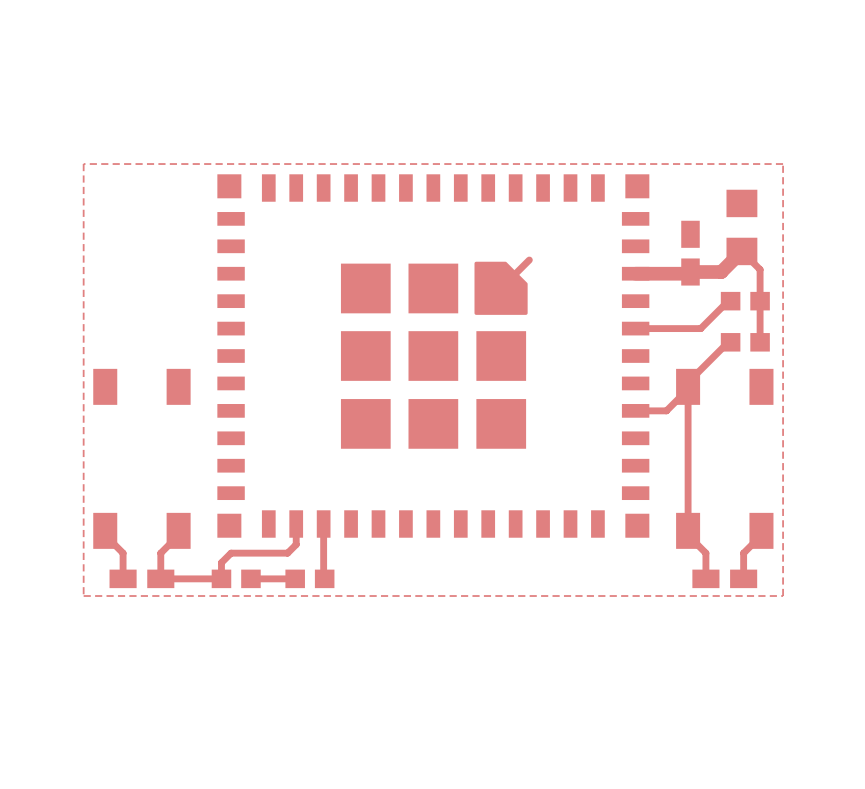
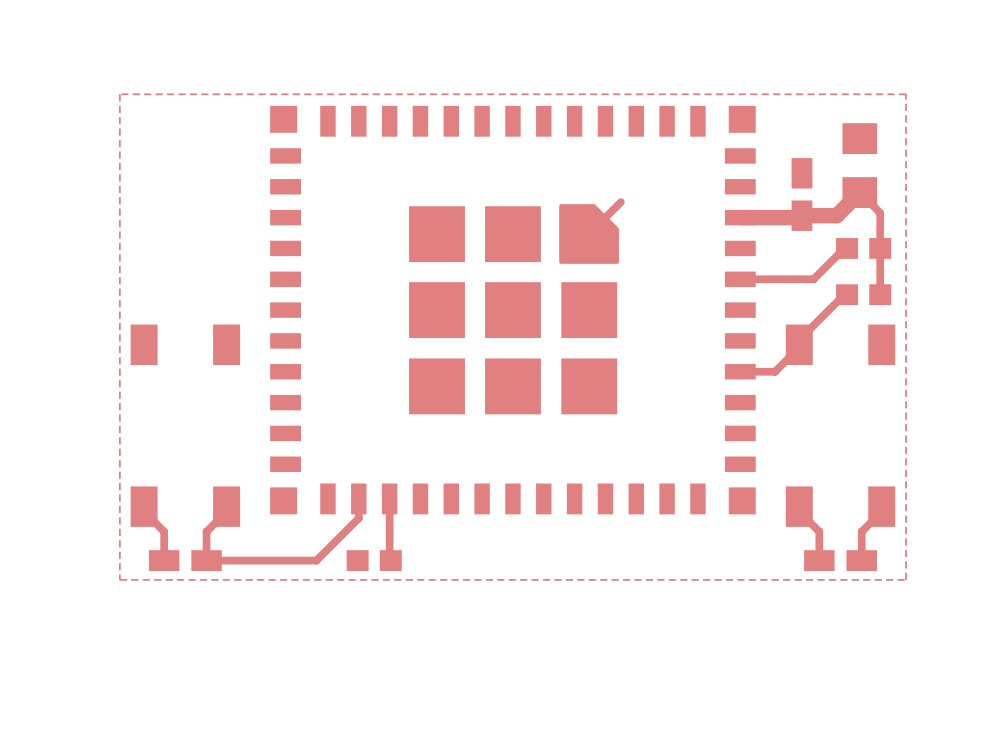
top track: (688, 389) (688, 530) -> none
top track: (296, 541) (296, 544) (287, 553) (231, 553) (221, 562) (221, 578) -> (358, 518) (316, 560)
part: (236, 578) -> none
top track: none -> (307, 560) (274, 560)
top track: (295, 578) (258, 578) -> none

